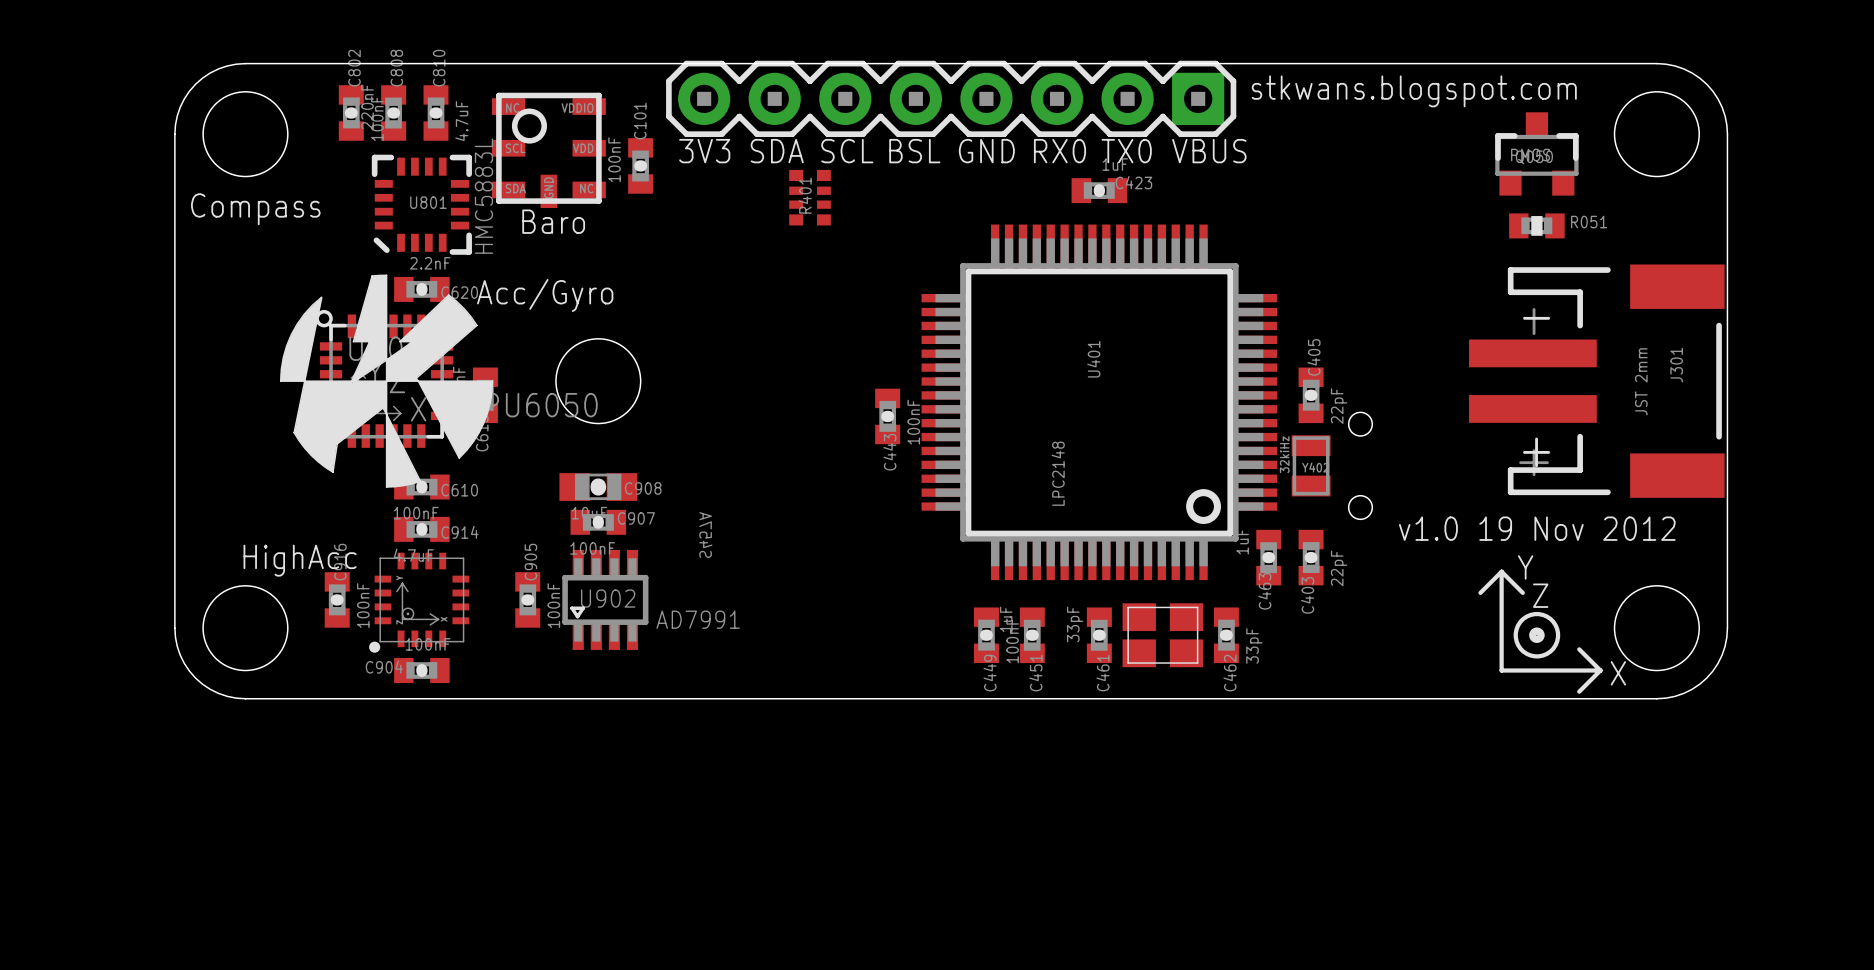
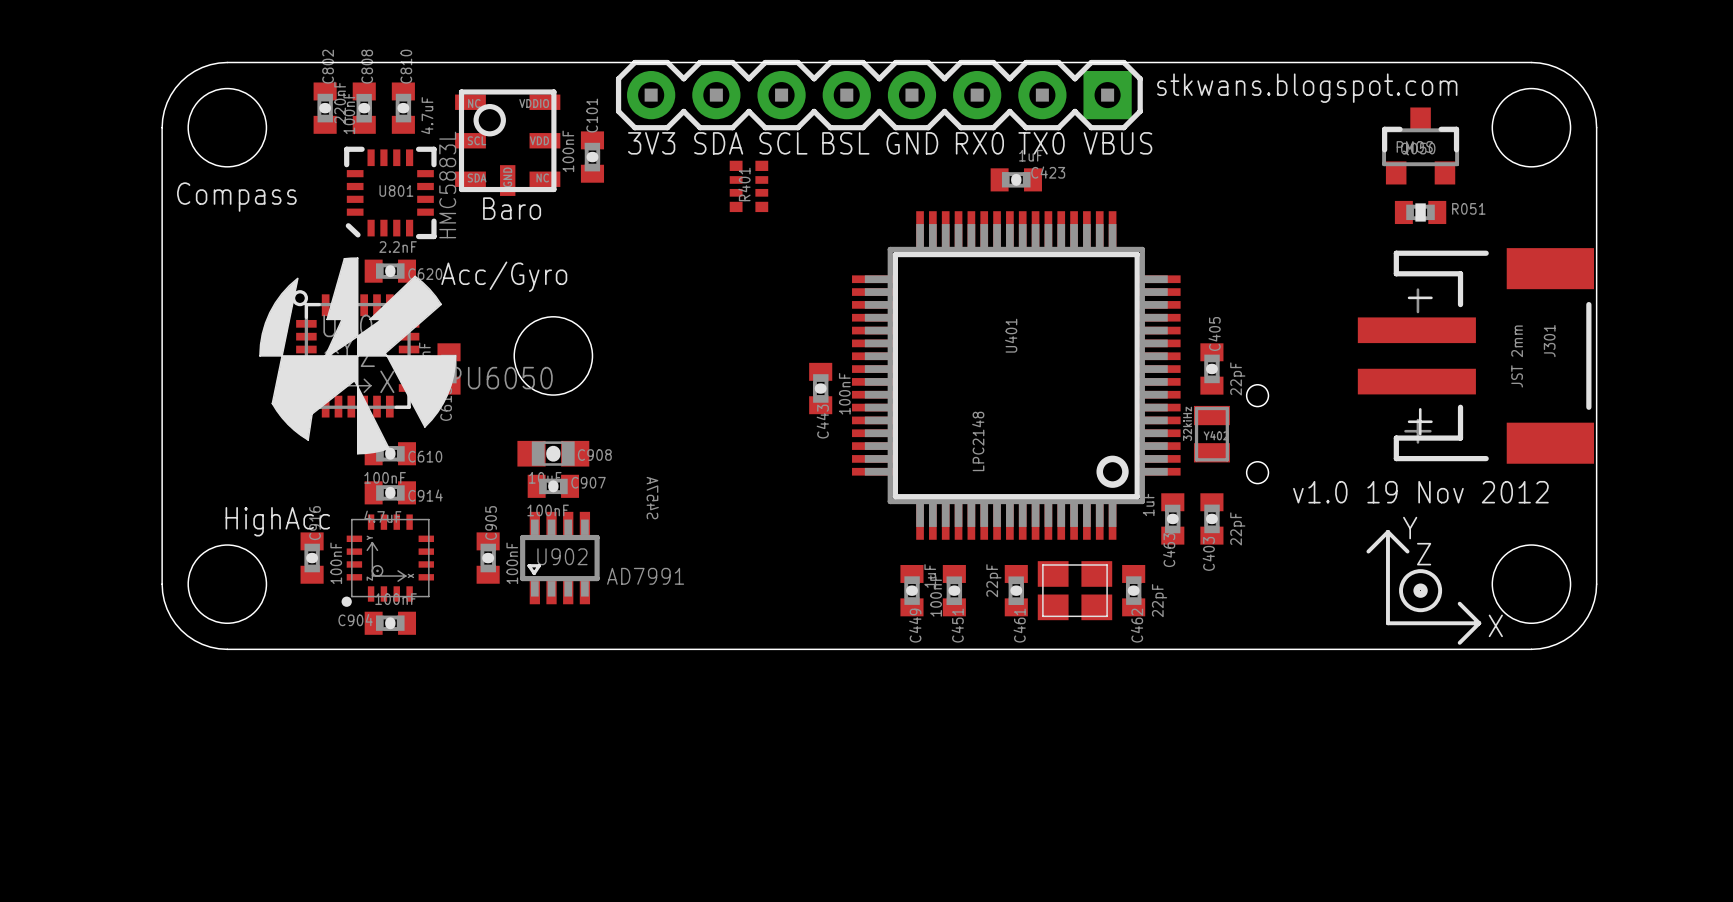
C461 value: 33pF (1075, 624) -> 22pF (993, 580)
C462 value: 33pF (1254, 645) -> 22pF (1159, 600)

